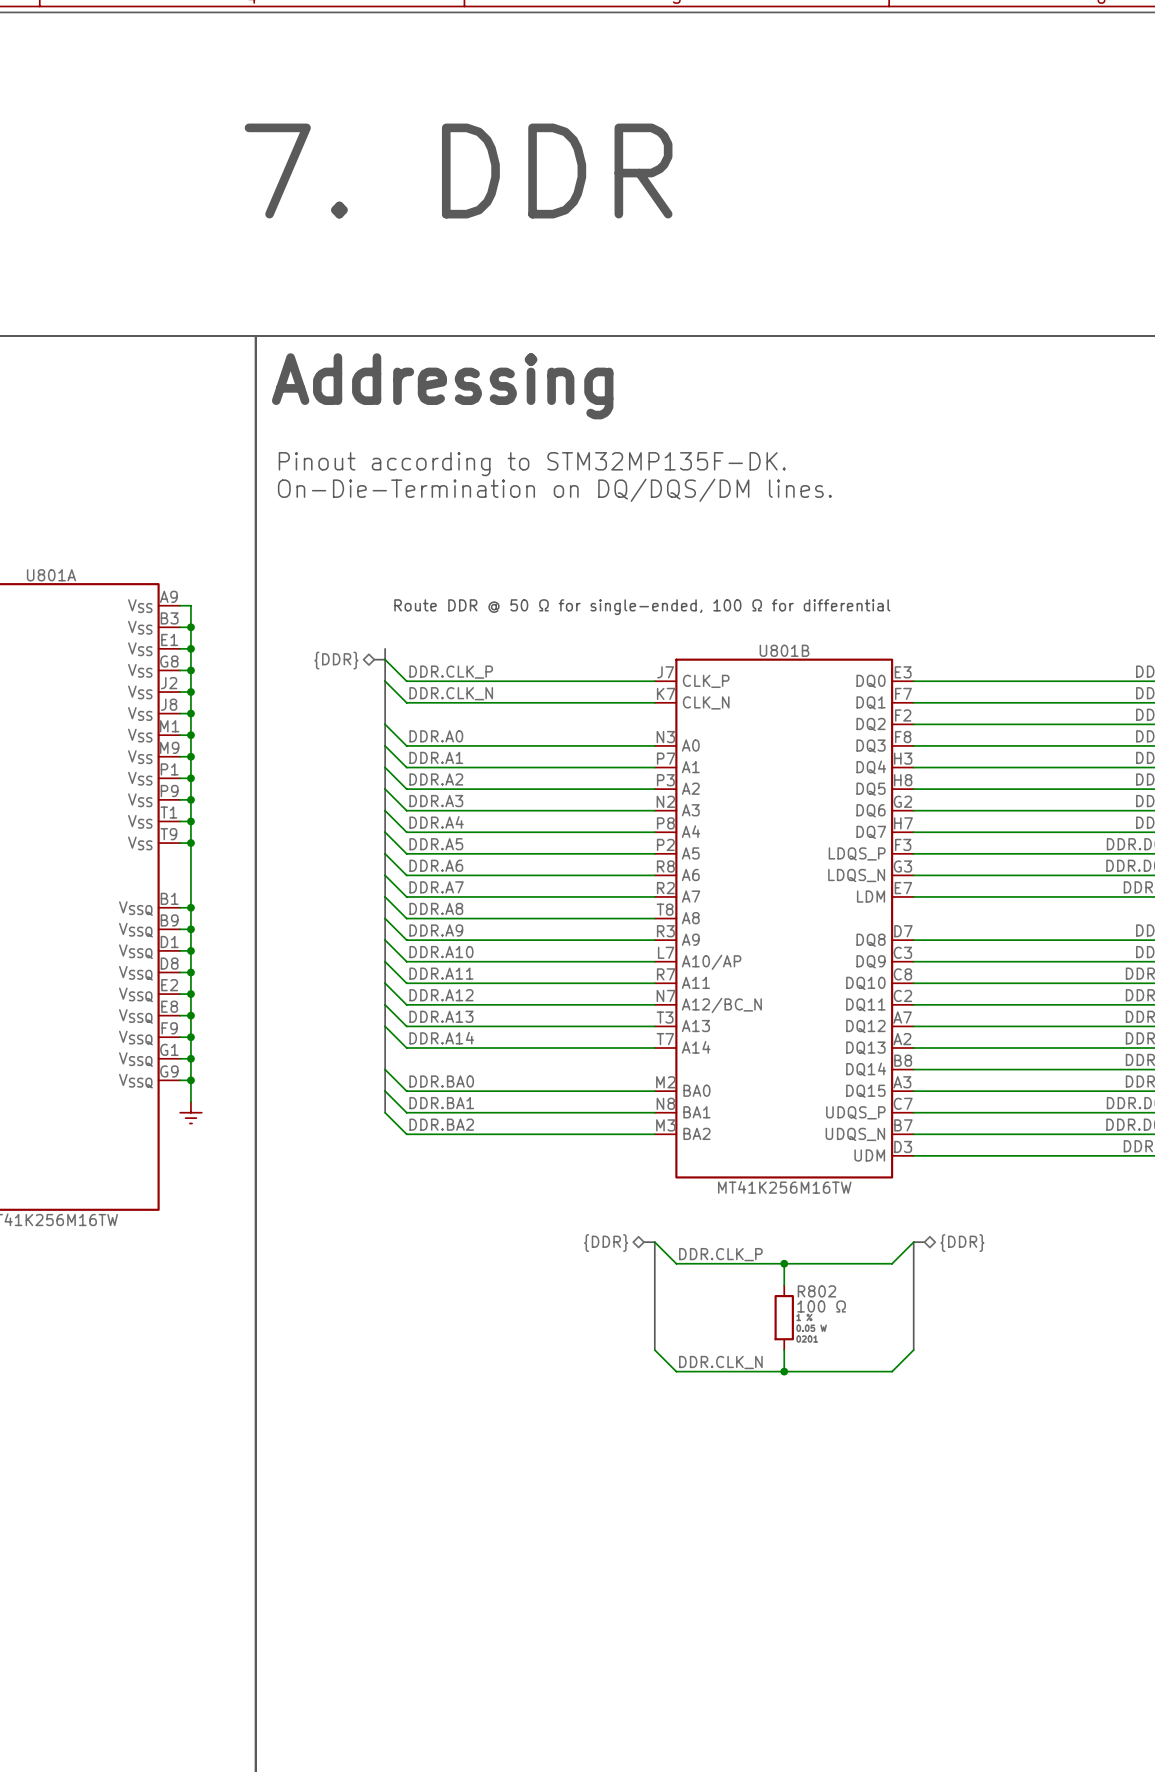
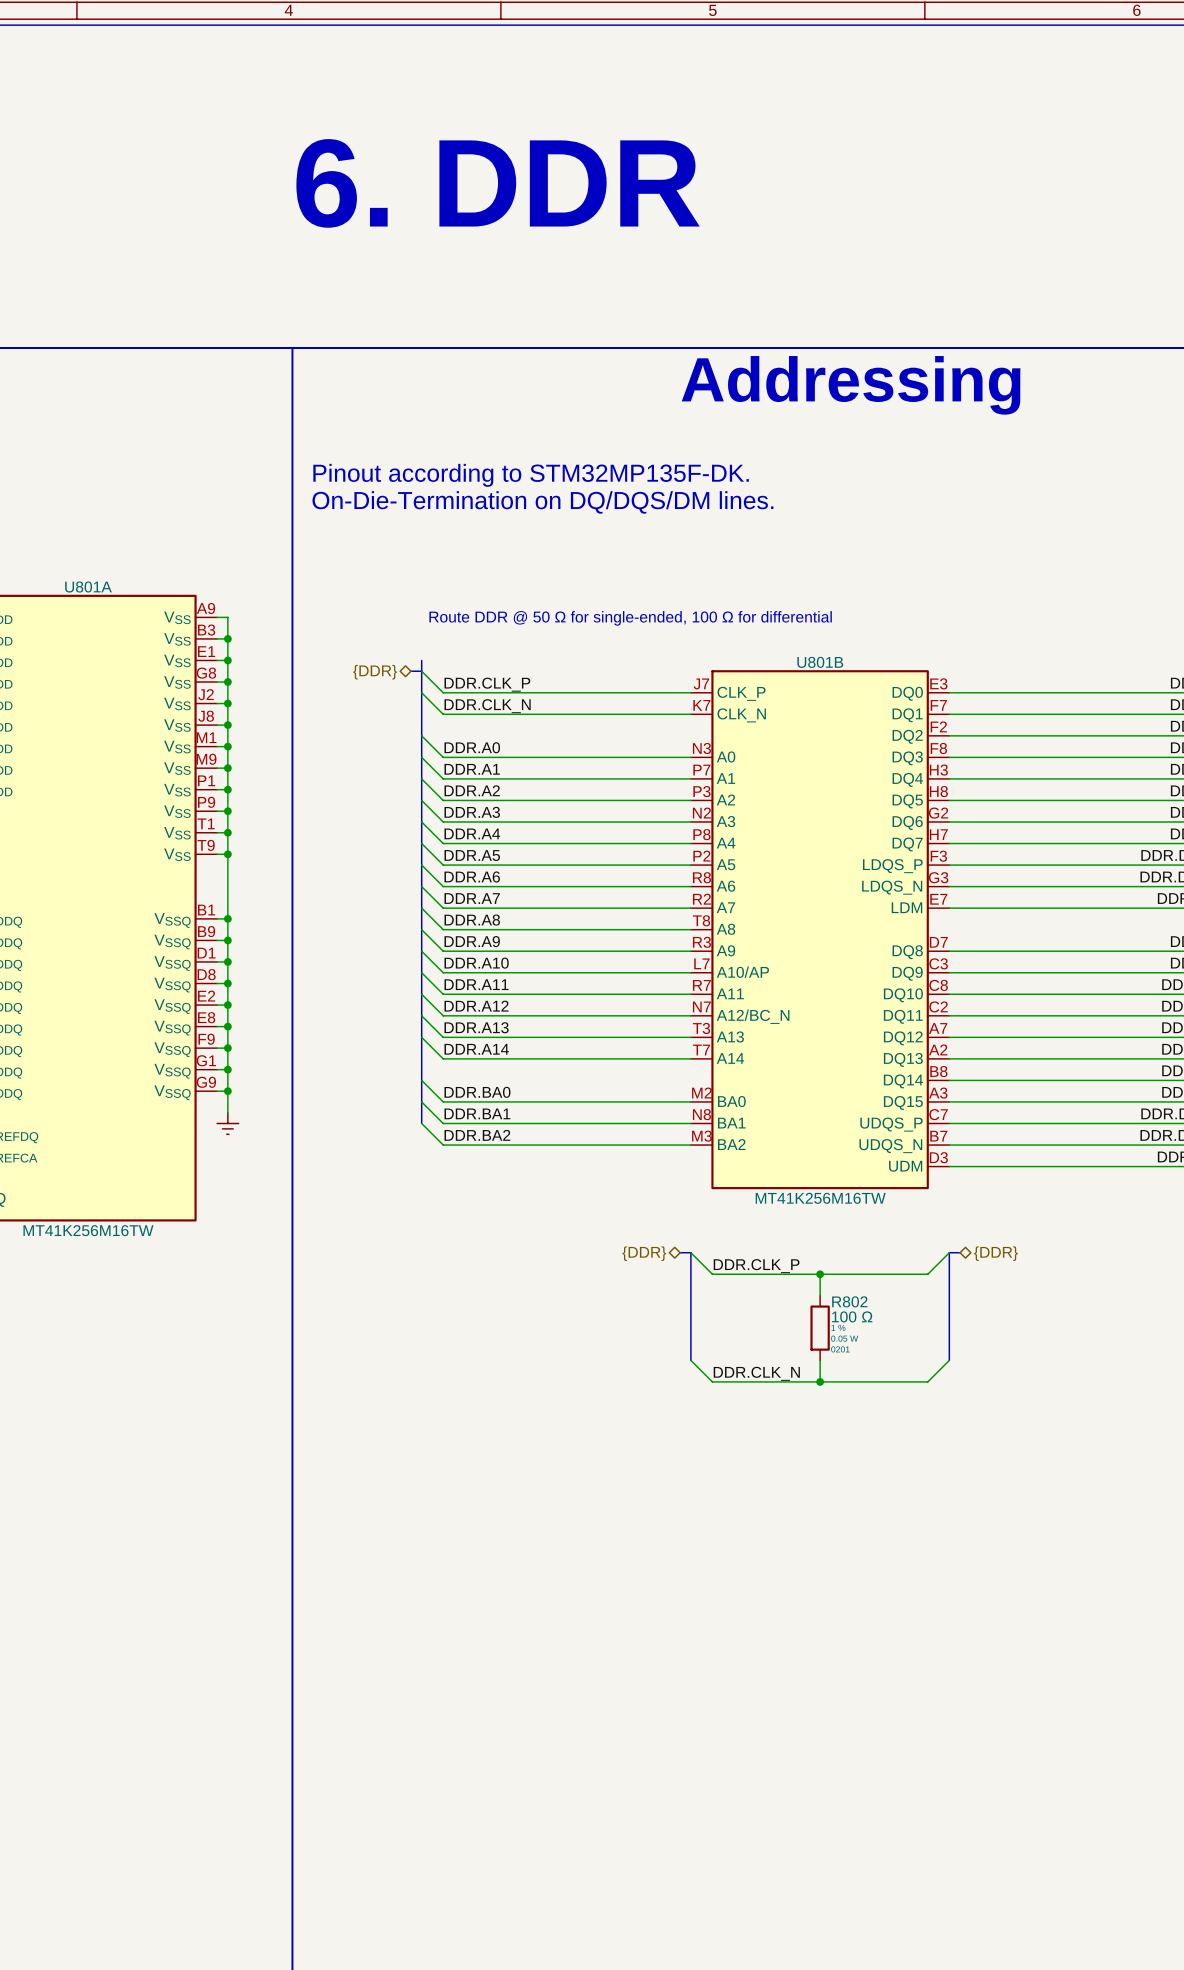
text: 7. DDR (458, 171) -> 6. DDR (498, 183)
text: none -> Addressing (851, 385)
text: Addressing (442, 386) -> none

